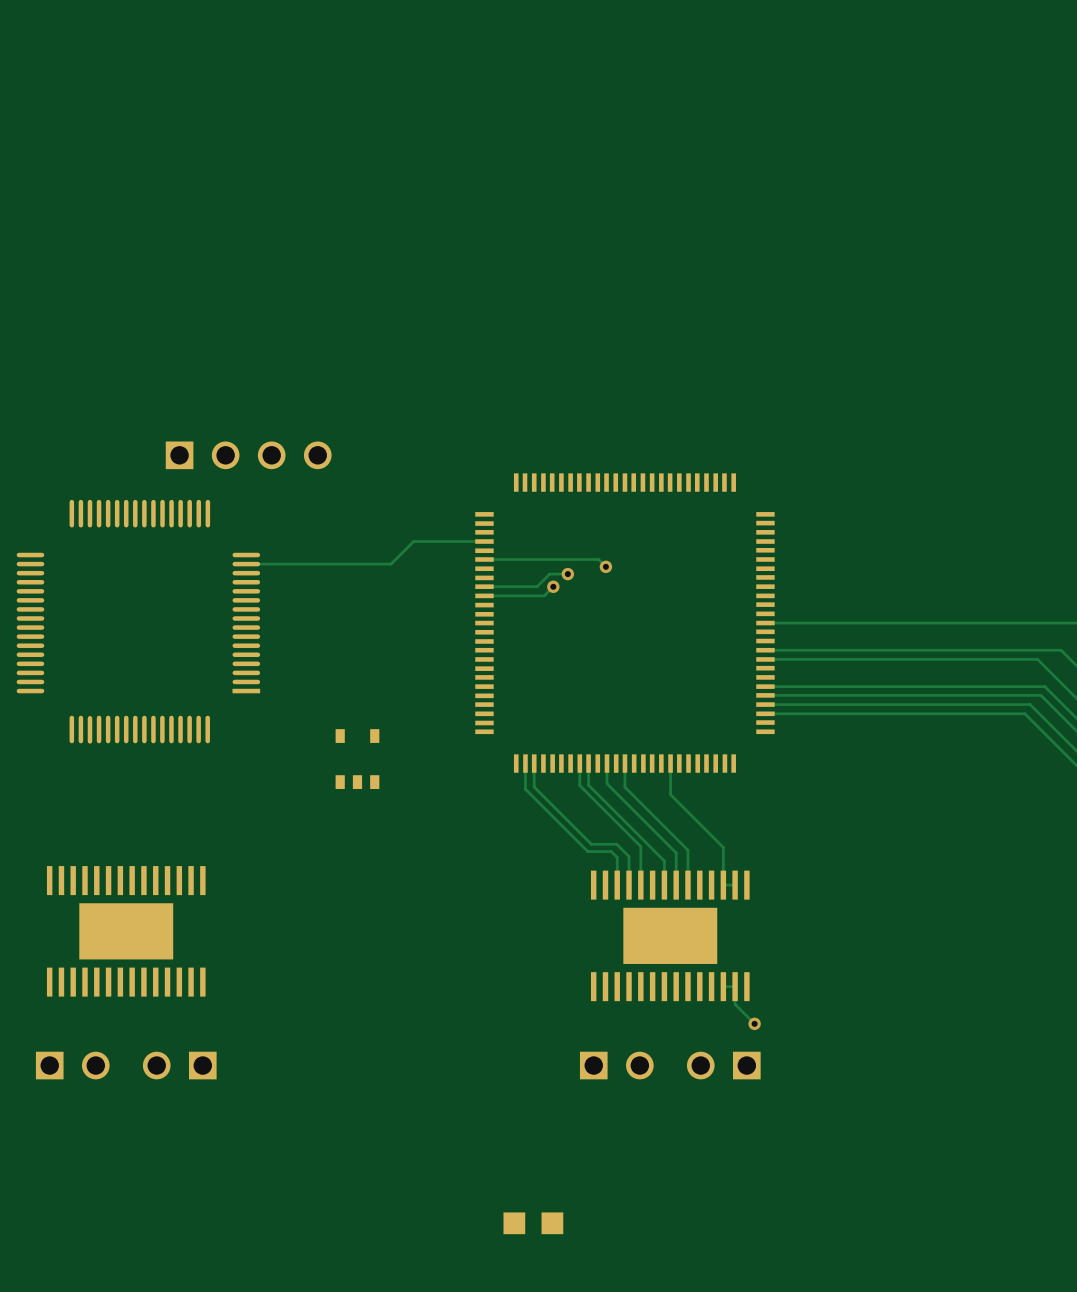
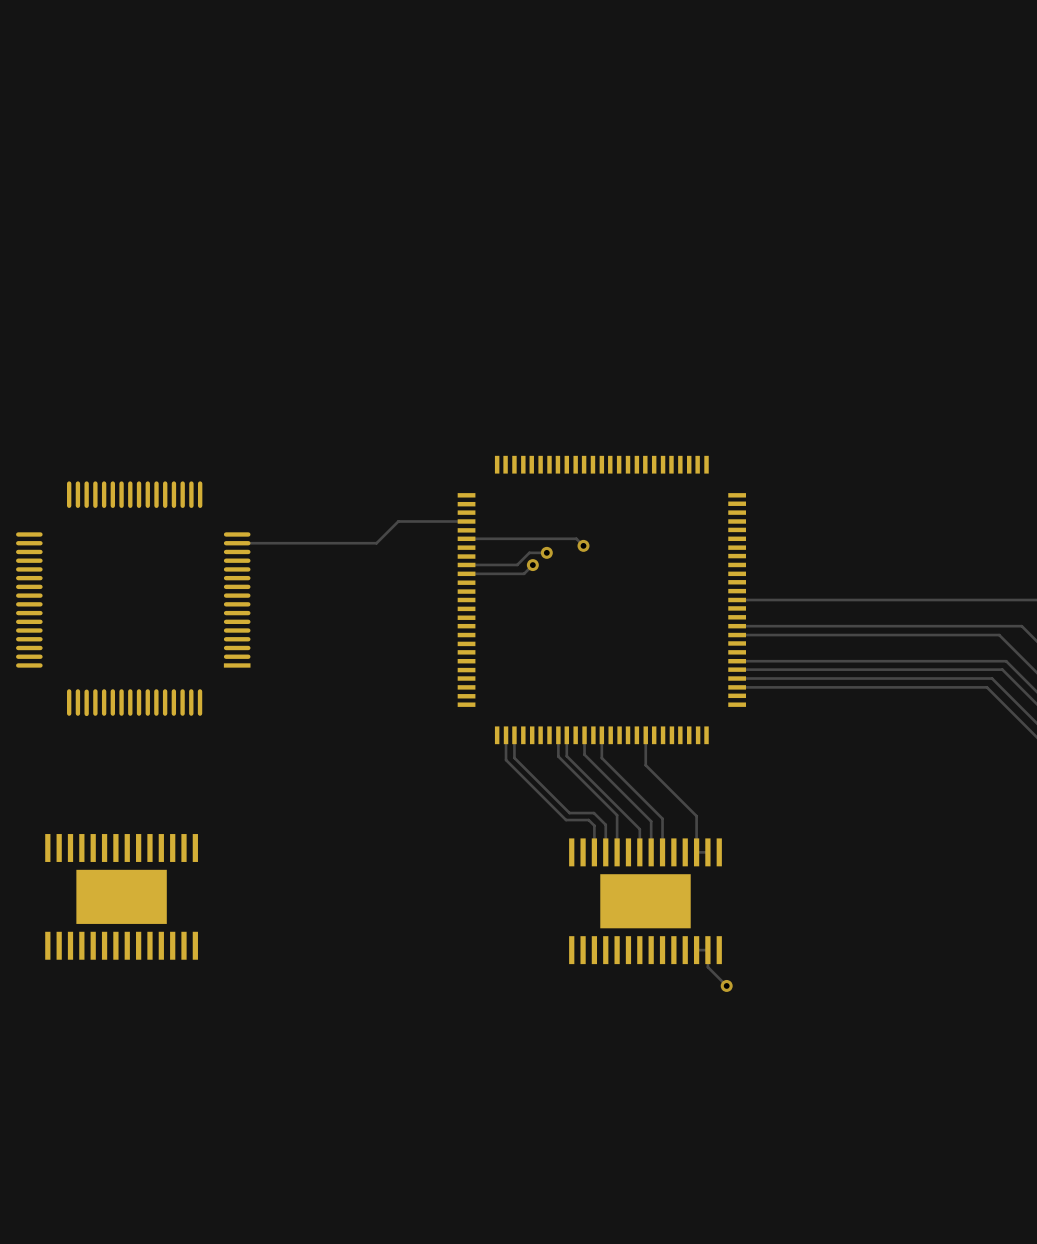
part: (248, 455) -> none
part: (357, 759) -> none
part: (72, 1065) -> none
part: (179, 1065) -> none
part: (616, 1065) -> none
part: (723, 1065) -> none
part: (533, 1223) -> none

